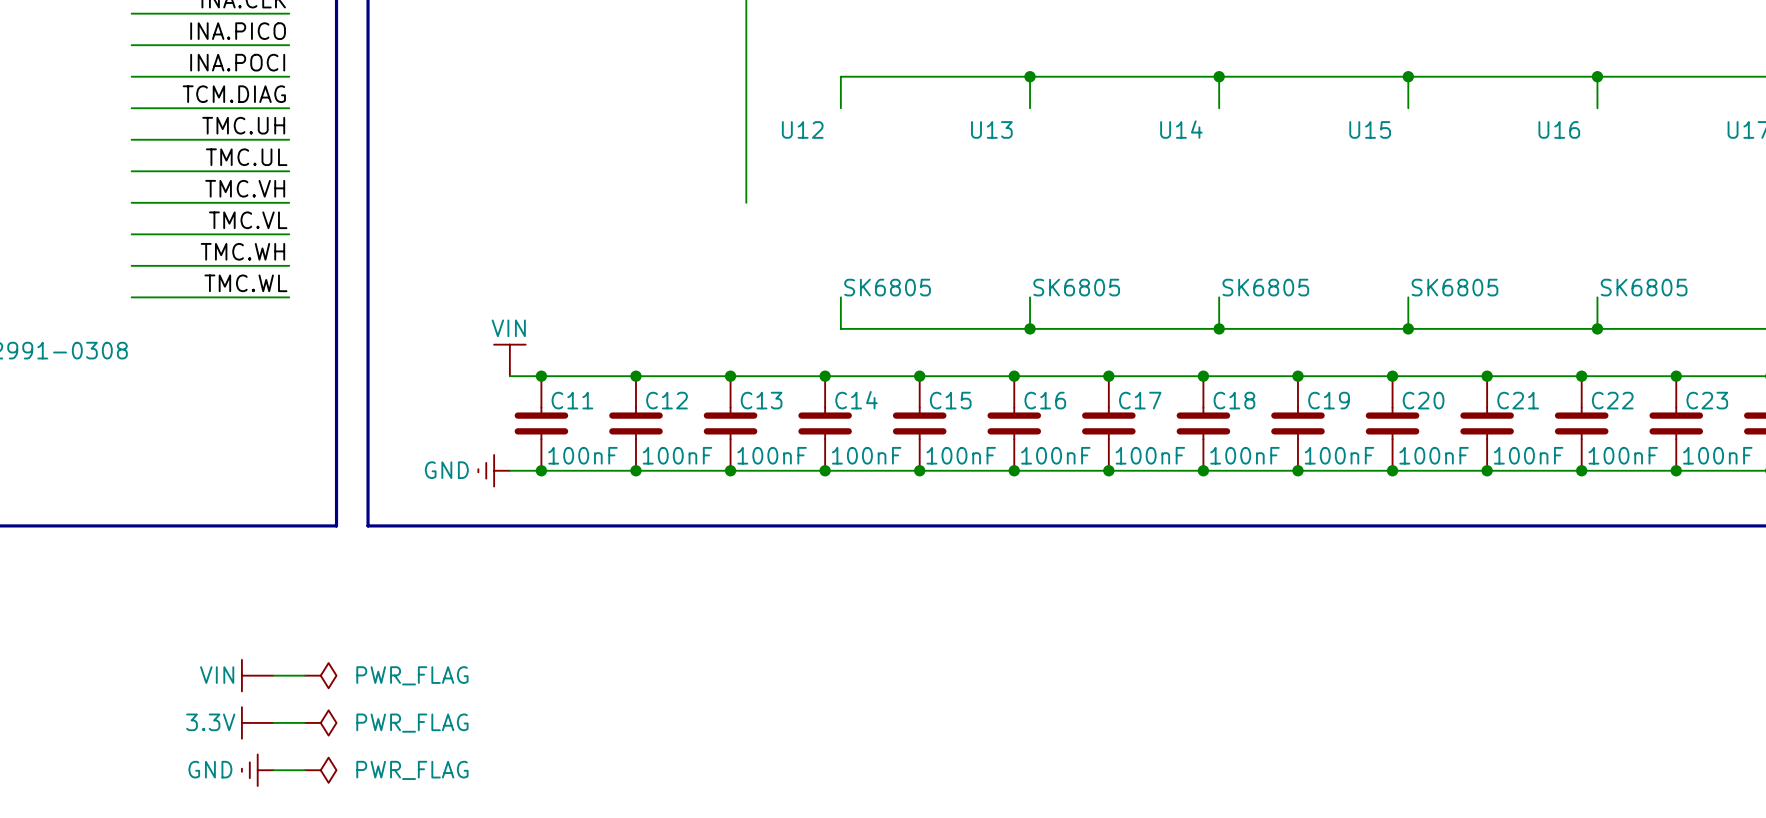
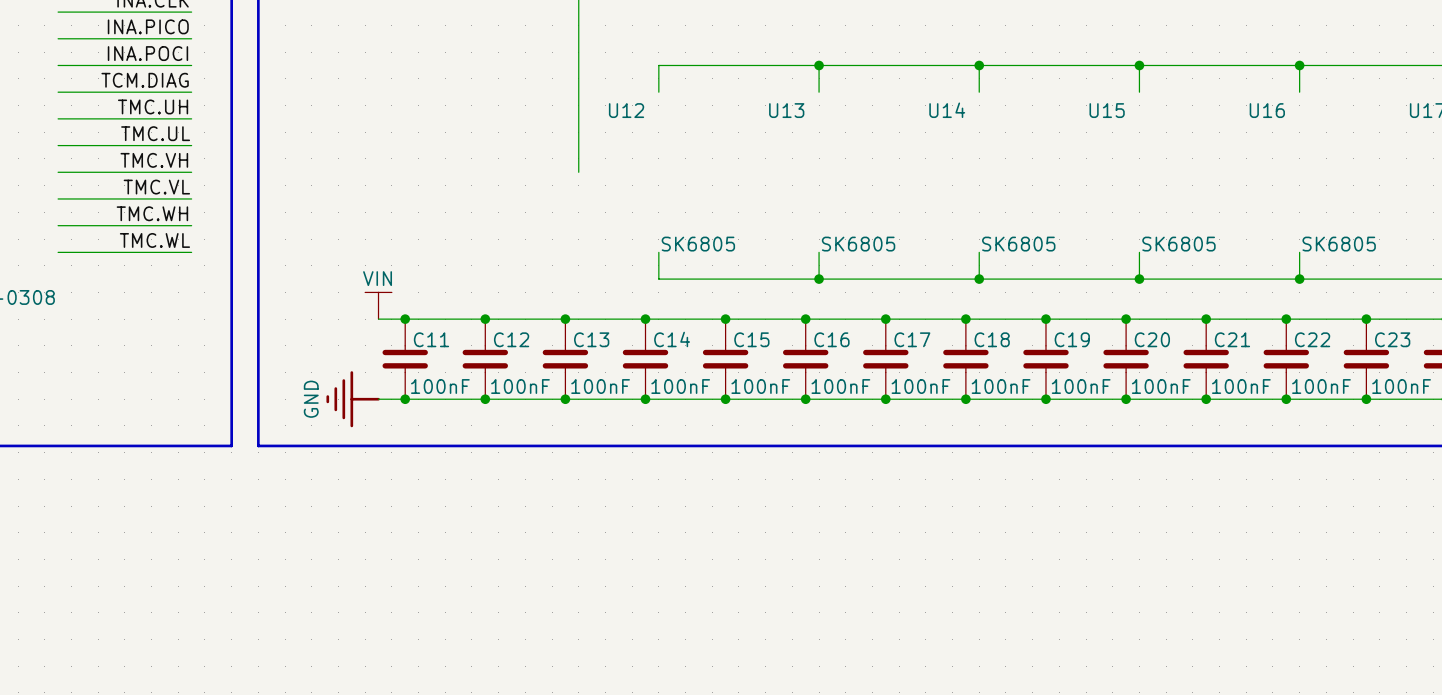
power symbol: none -> GND (353, 399)
power symbol: GND (494, 470) -> none
power symbol: VIN (257, 675) -> none
wire: (273, 675) (304, 675) -> none
power symbol: PWR_FLAG (320, 675) -> none
power symbol: 3.3V (257, 722) -> none
wire: (273, 722) (304, 722) -> none
power symbol: PWR_FLAG (320, 722) -> none
power symbol: GND (257, 770) -> none
wire: (273, 770) (304, 770) -> none
power symbol: PWR_FLAG (320, 770) -> none

